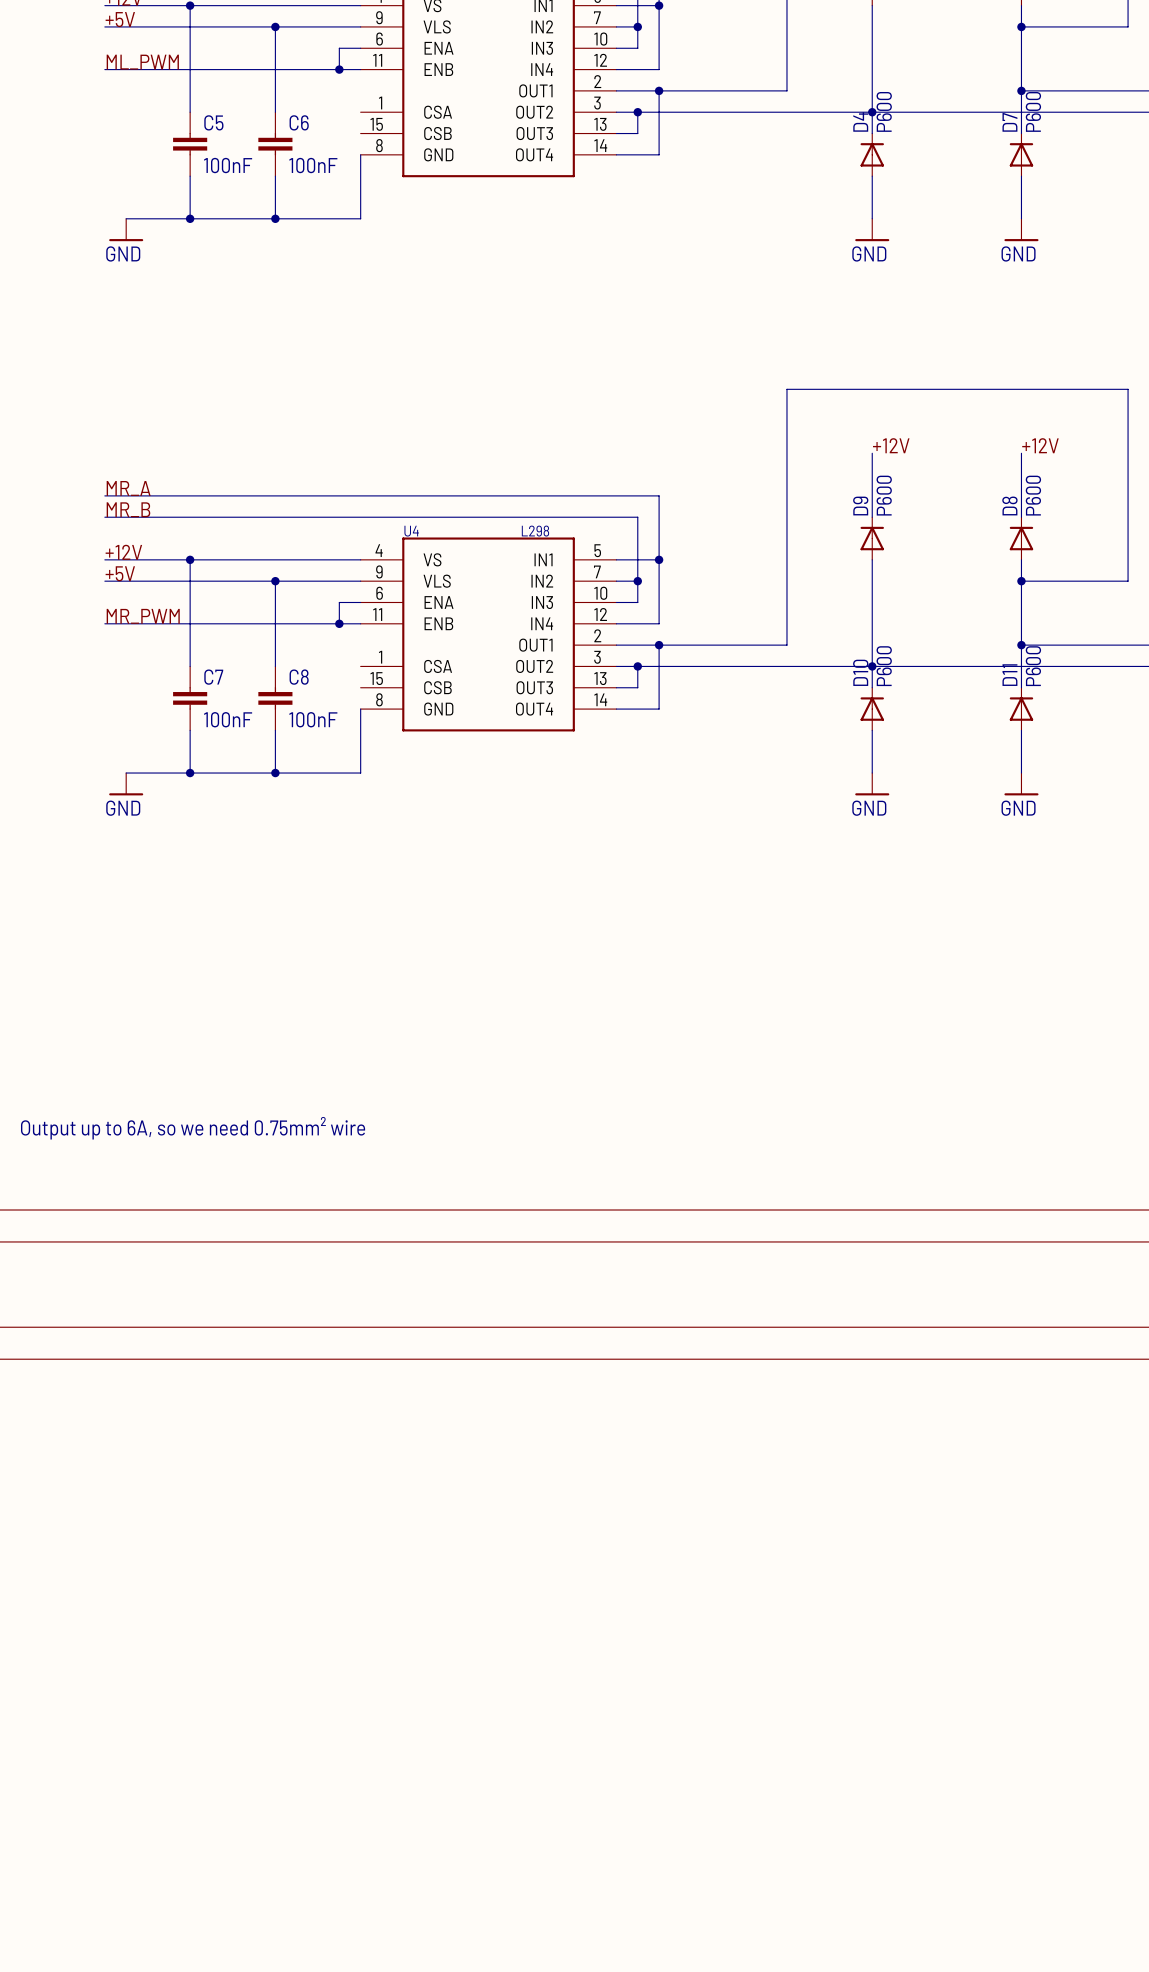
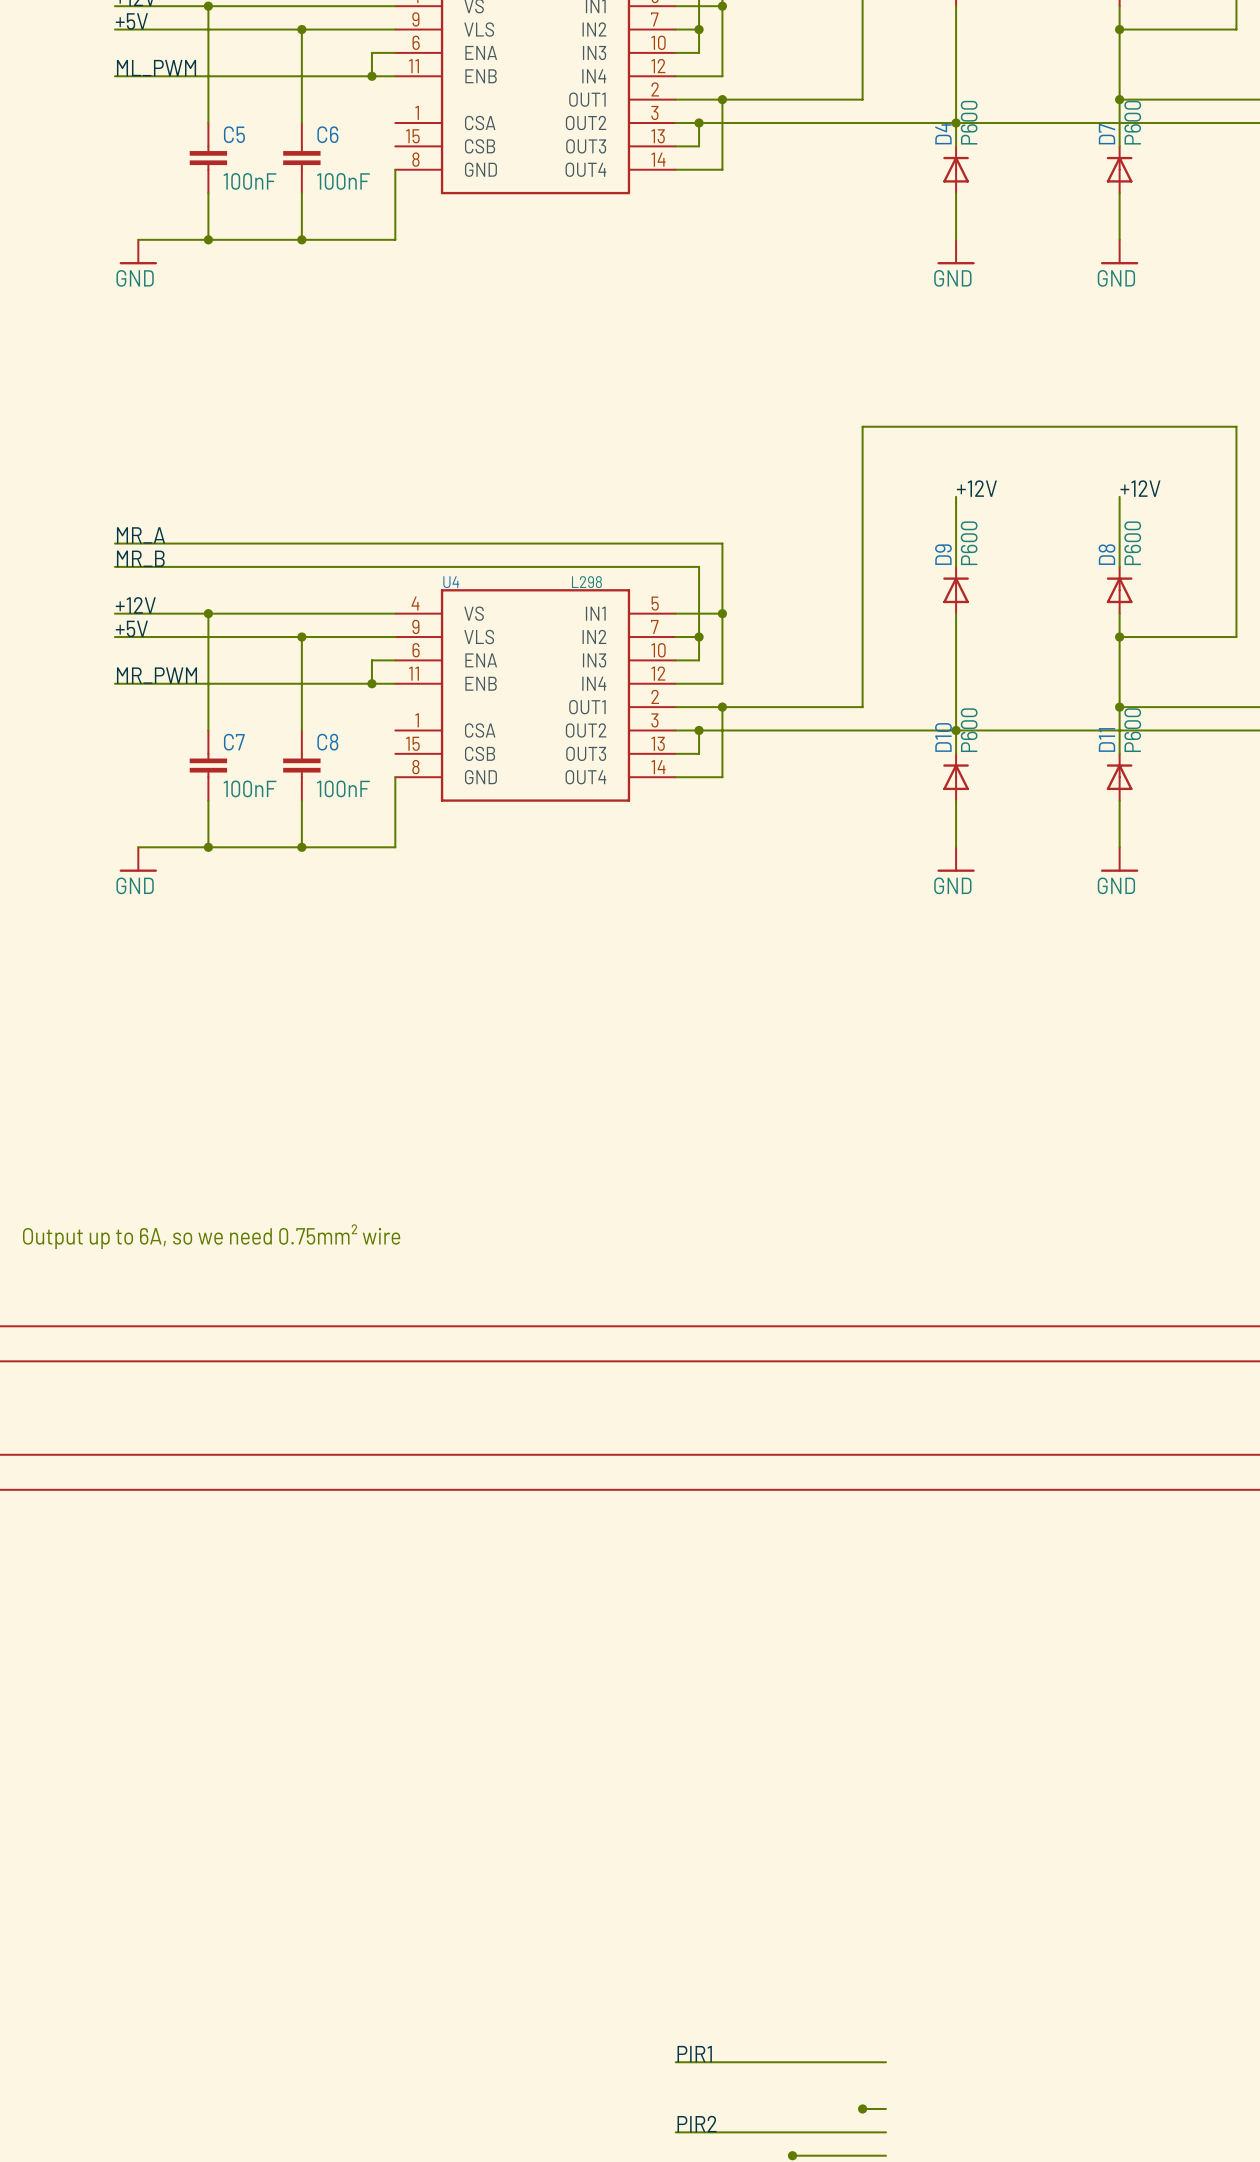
label: none -> PIR1 (694, 2054)
wire: none -> (675, 2062) (885, 2062)
wire: none -> (862, 2108) (885, 2108)
junction: none -> (862, 2108)
label: none -> PIR2 (697, 2124)
wire: none -> (675, 2132) (885, 2132)
wire: none -> (792, 2155) (885, 2155)
junction: none -> (792, 2155)

